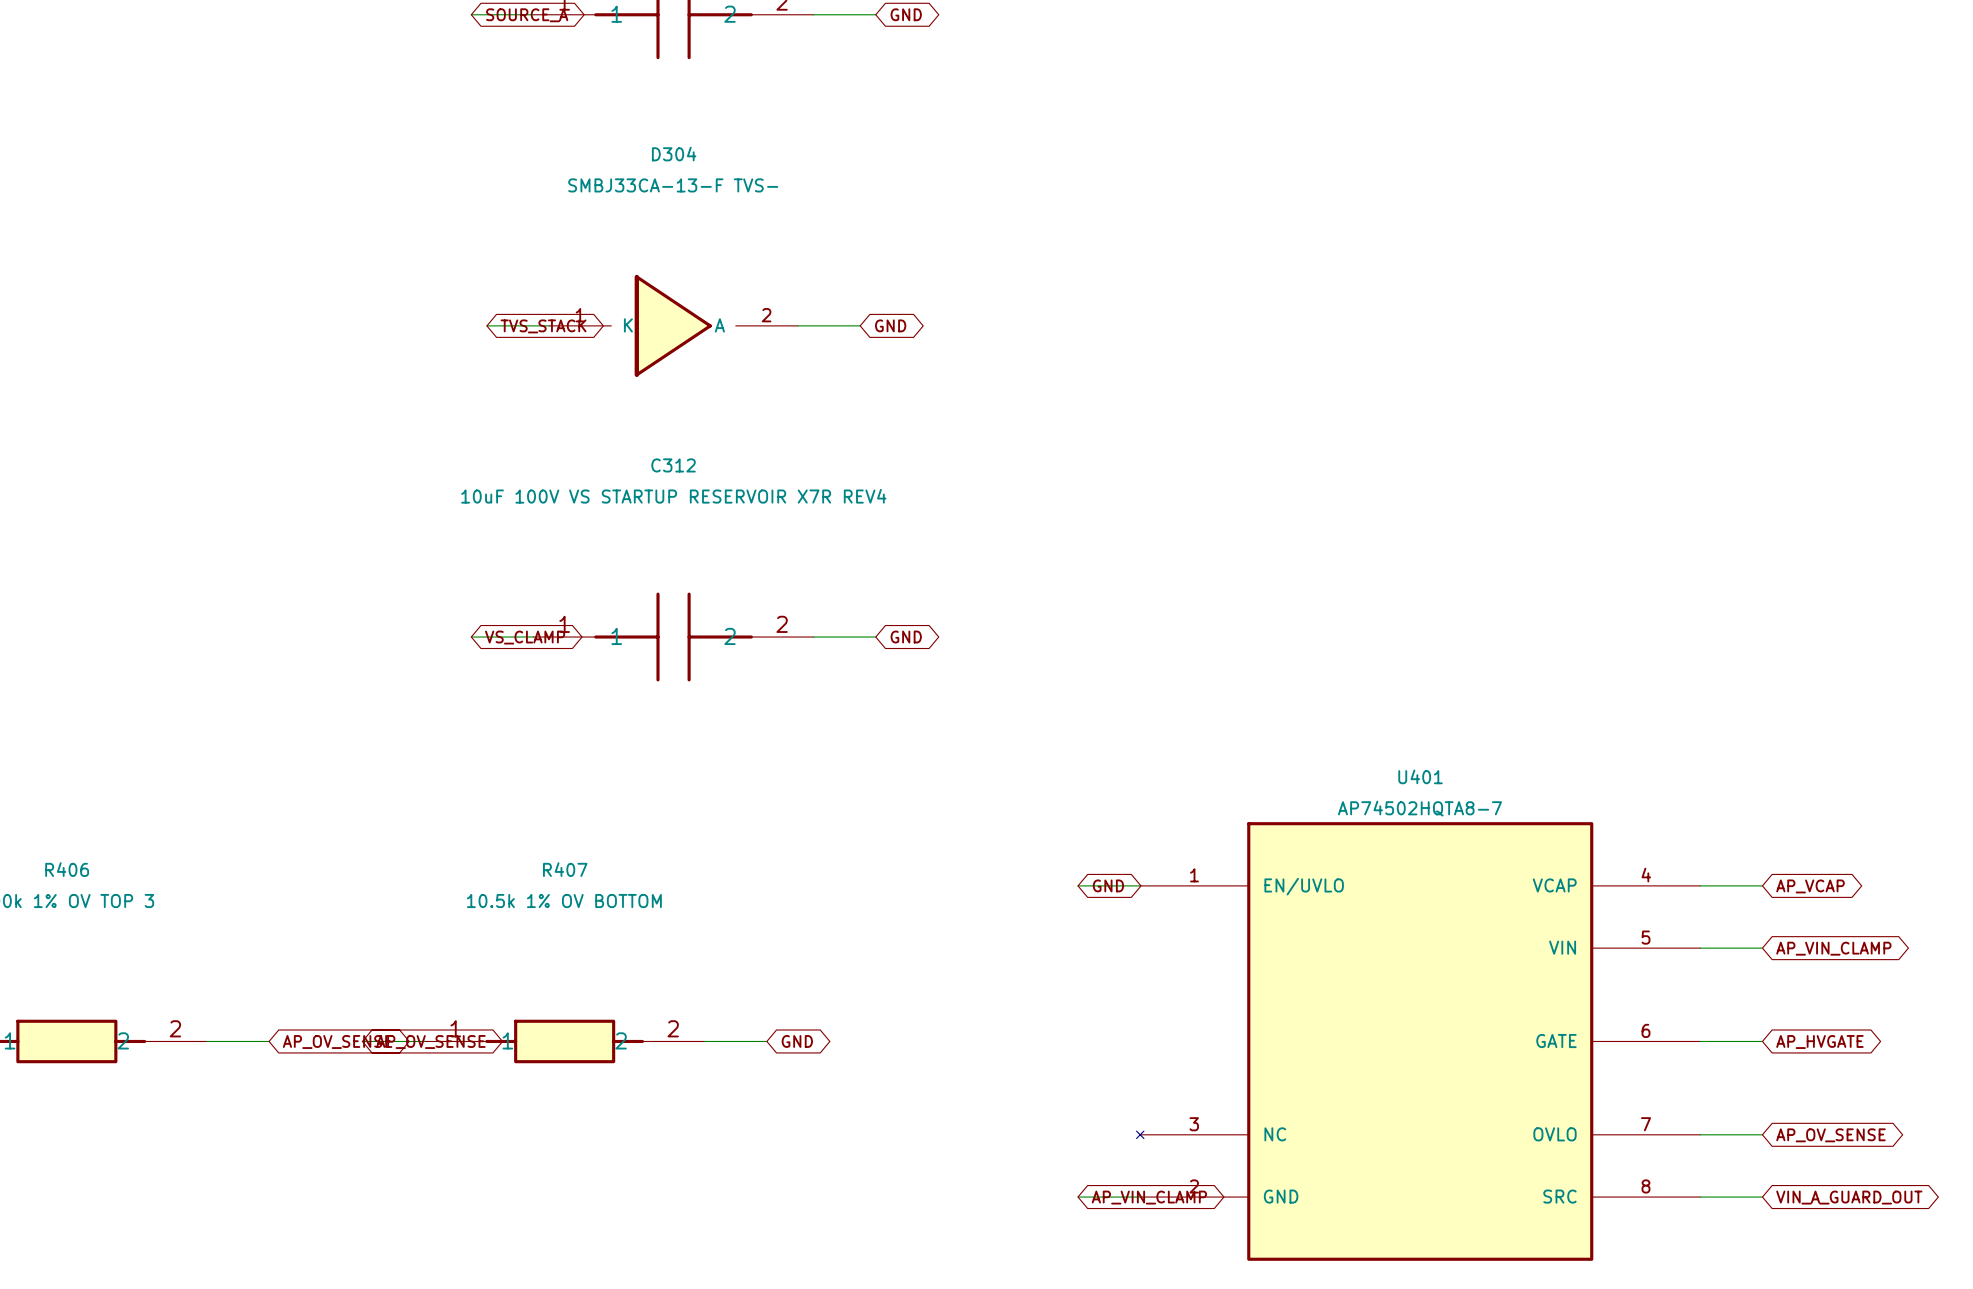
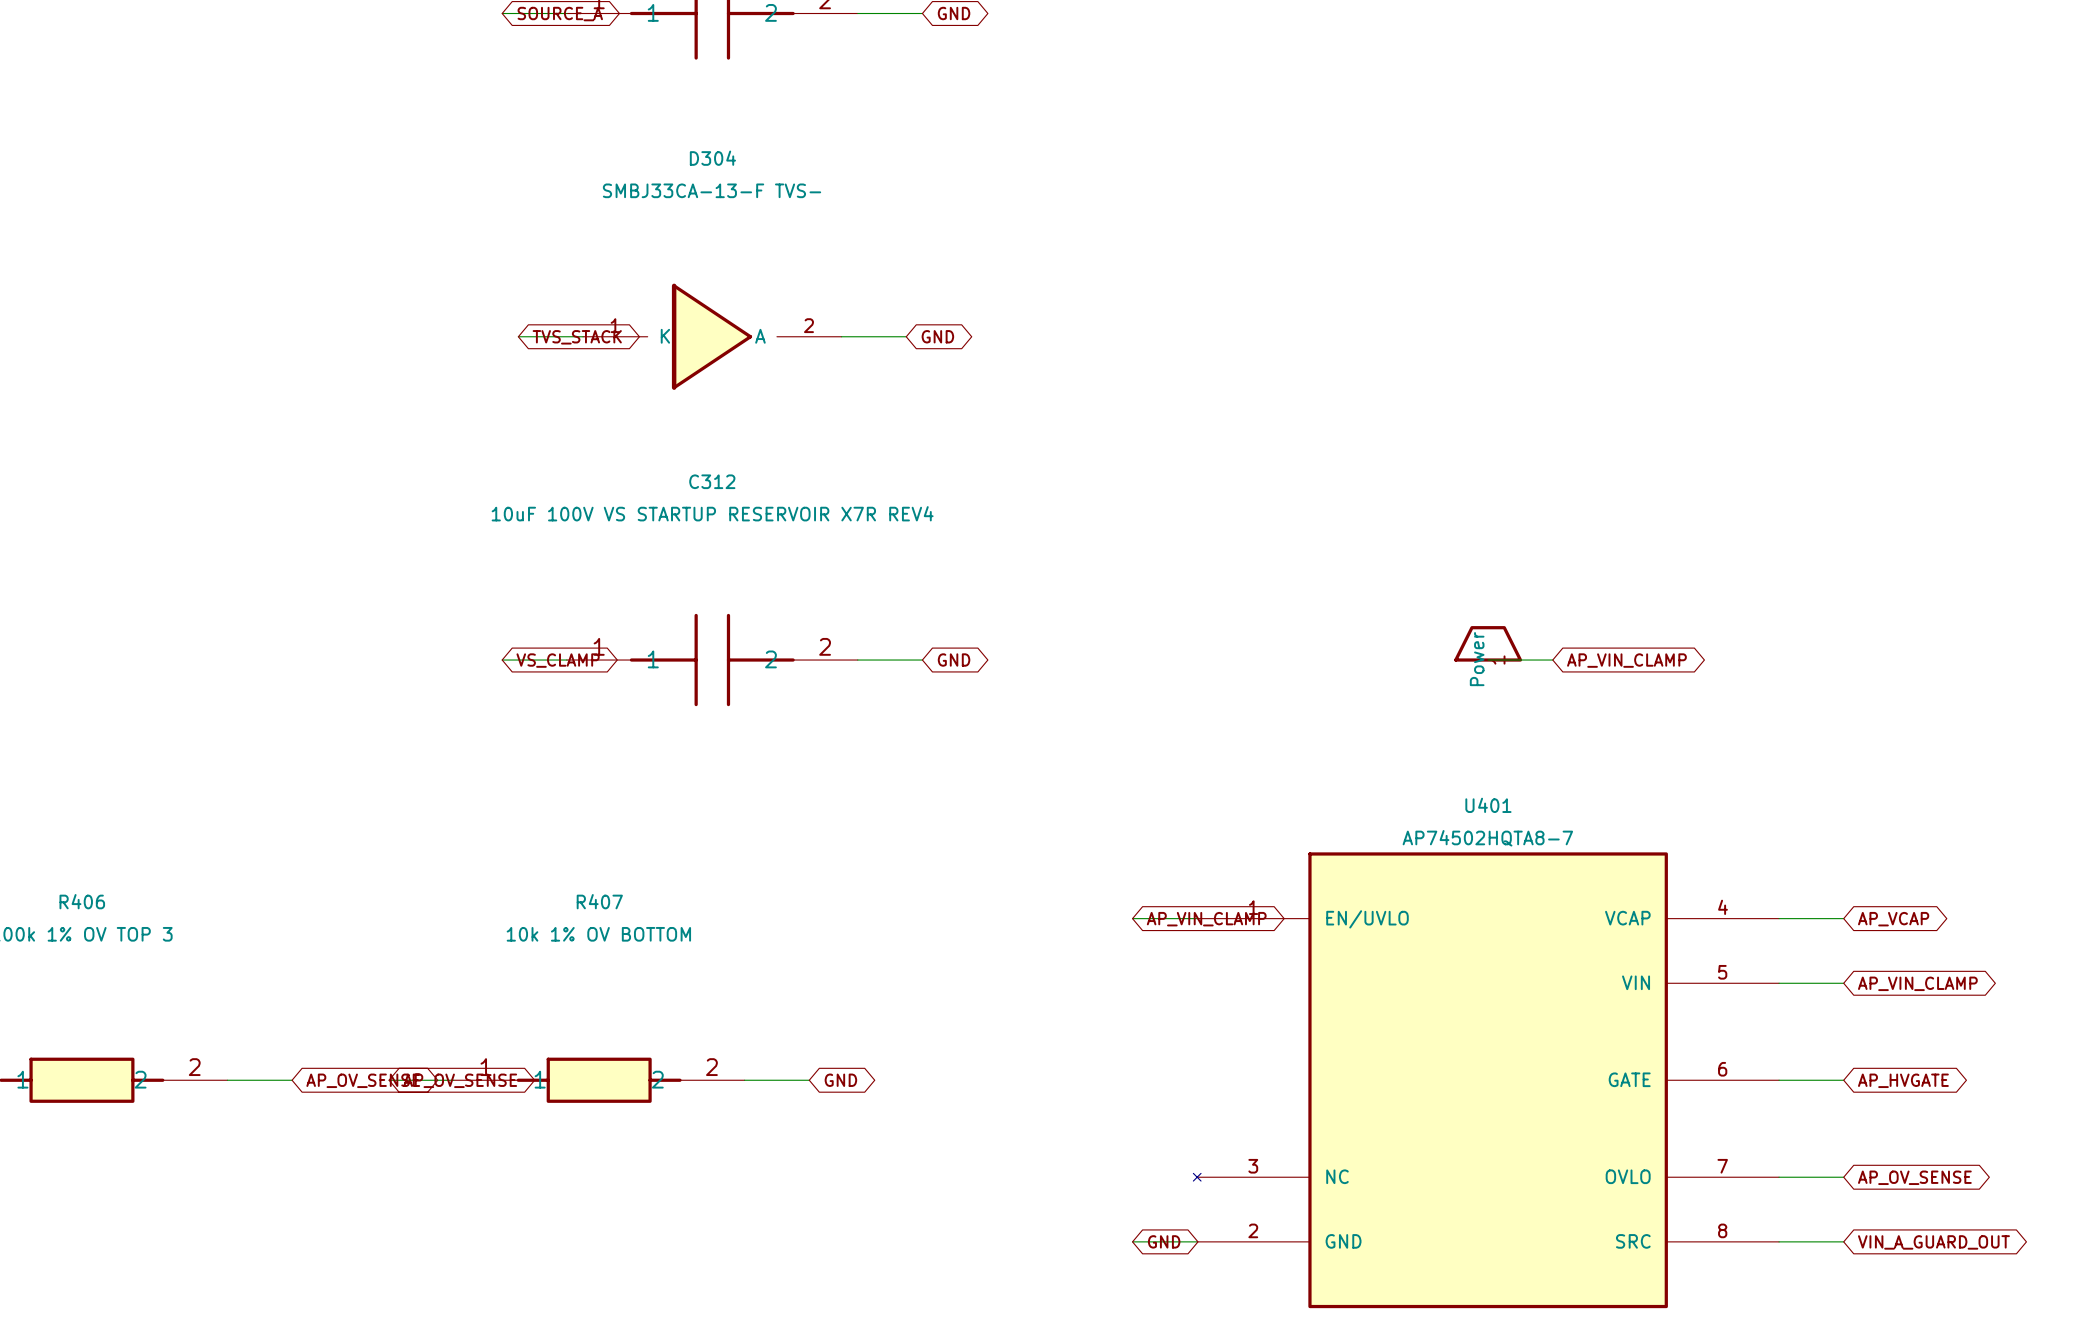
power symbol: none -> (1488, 643)
wire: none -> (1488, 660) (1552, 660)
global label: none -> AP_VIN_CLAMP (1626, 660)
global label: GND (1108, 885) -> AP_VIN_CLAMP (1206, 919)
R407 value: 10.5k 1% OV BOTTOM (564, 901) -> 10k 1% OV BOTTOM (598, 934)
global label: AP_VIN_CLAMP (1149, 1197) -> GND (1164, 1241)

